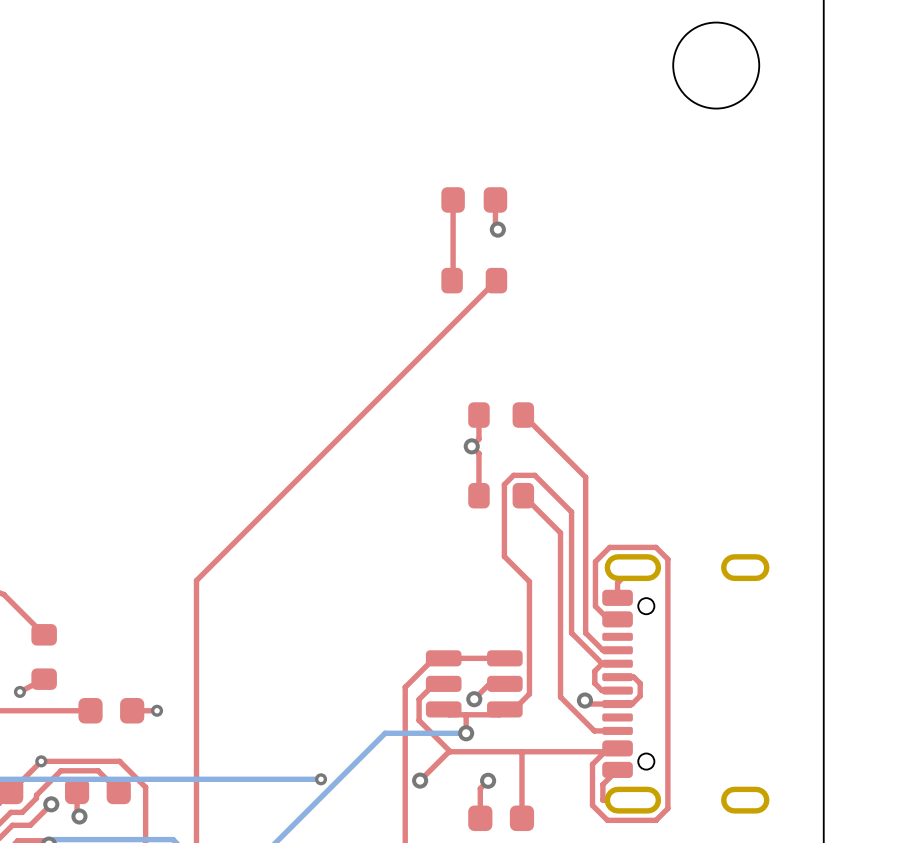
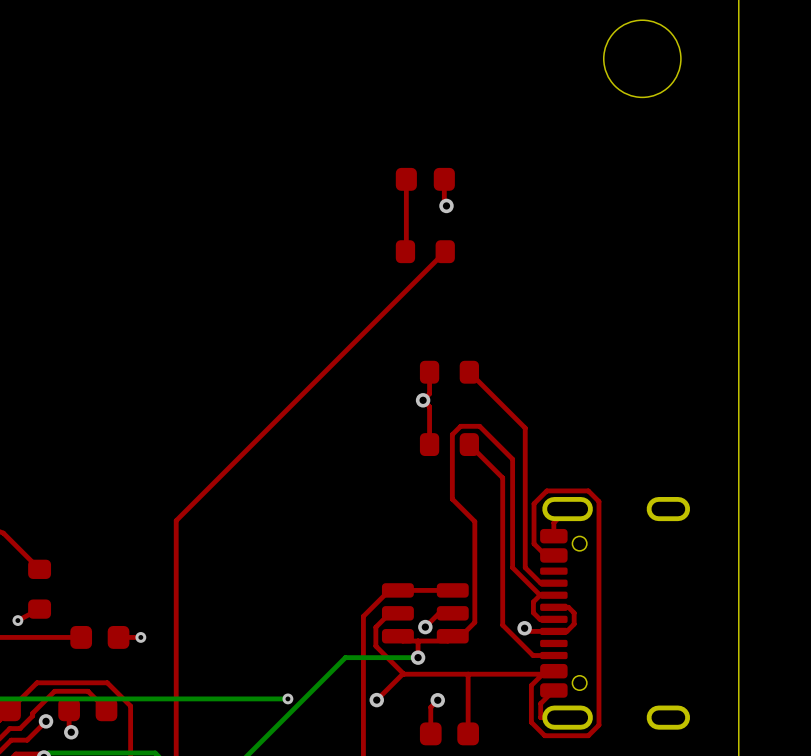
via: (41, 761) -> none

